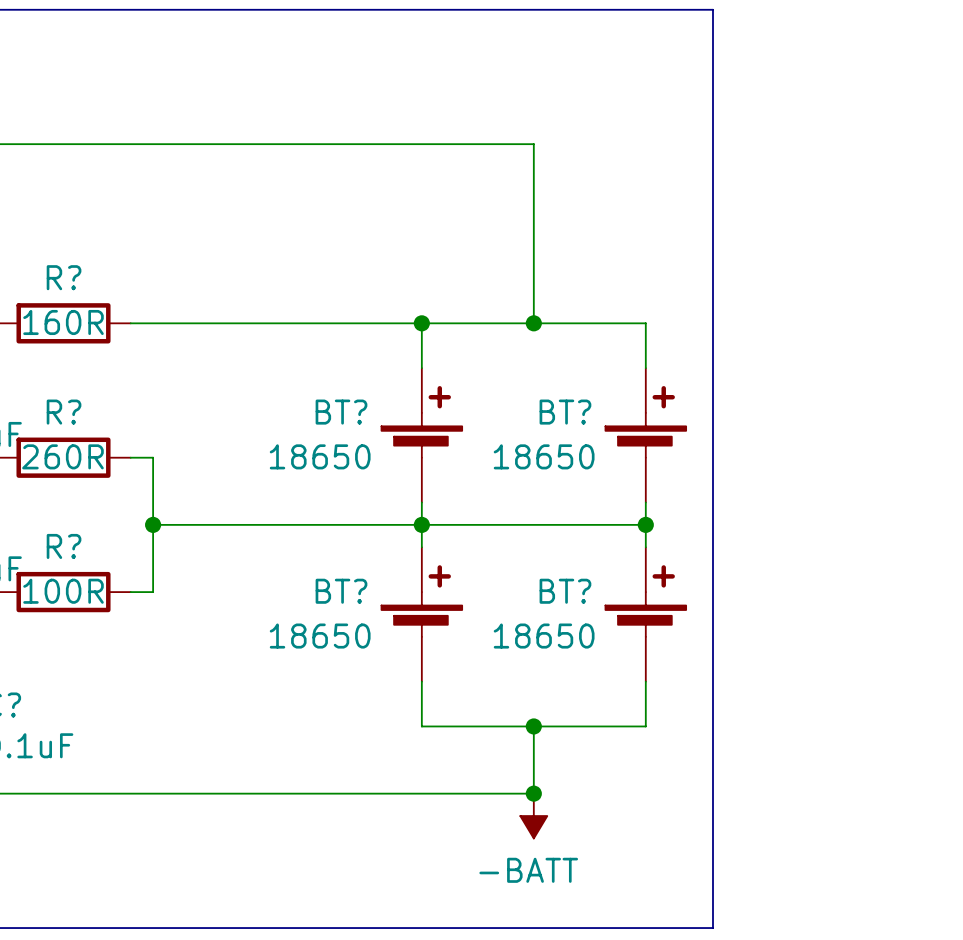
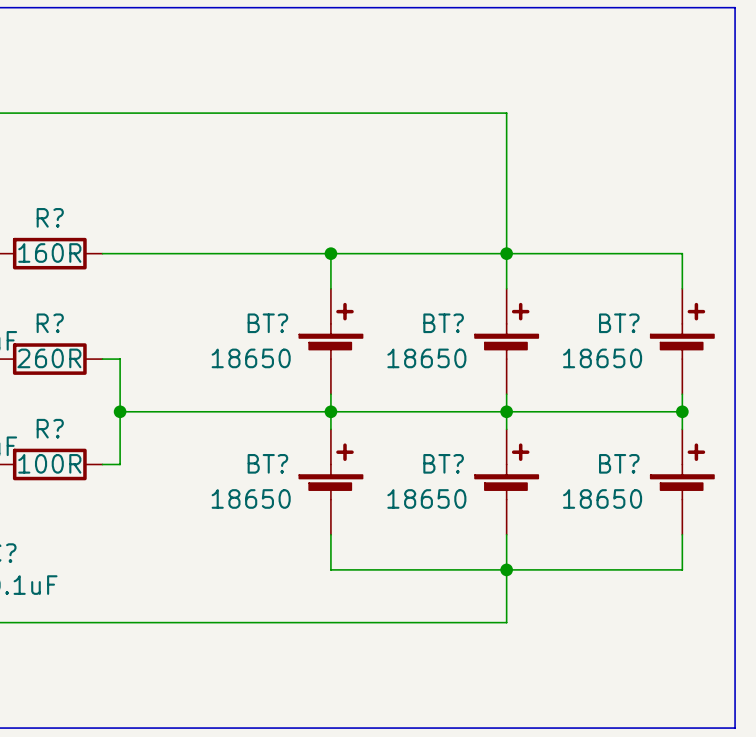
line: (712, 9) (712, 928) -> (559, 7) (735, 7) (735, 728) (559, 728)
wire: (533, 144) (533, 323) -> (418, 113) (506, 113) (506, 253) (682, 253) (682, 288)
junction: (533, 323) -> none
junction: none -> (506, 253)
BT?: none -> 18650 (682, 341)
wire: none -> (682, 394) (682, 429)
wire: none -> (506, 411) (682, 411)
junction: none -> (682, 411)
BT?: none -> 18650 (682, 482)
wire: (533, 726) (533, 793) -> (682, 534) (682, 569) (506, 569) (506, 622) (418, 622)
junction: (533, 726) -> none
junction: none -> (506, 569)
junction: (533, 793) -> none
power symbol: -BATT (533, 816) -> none

